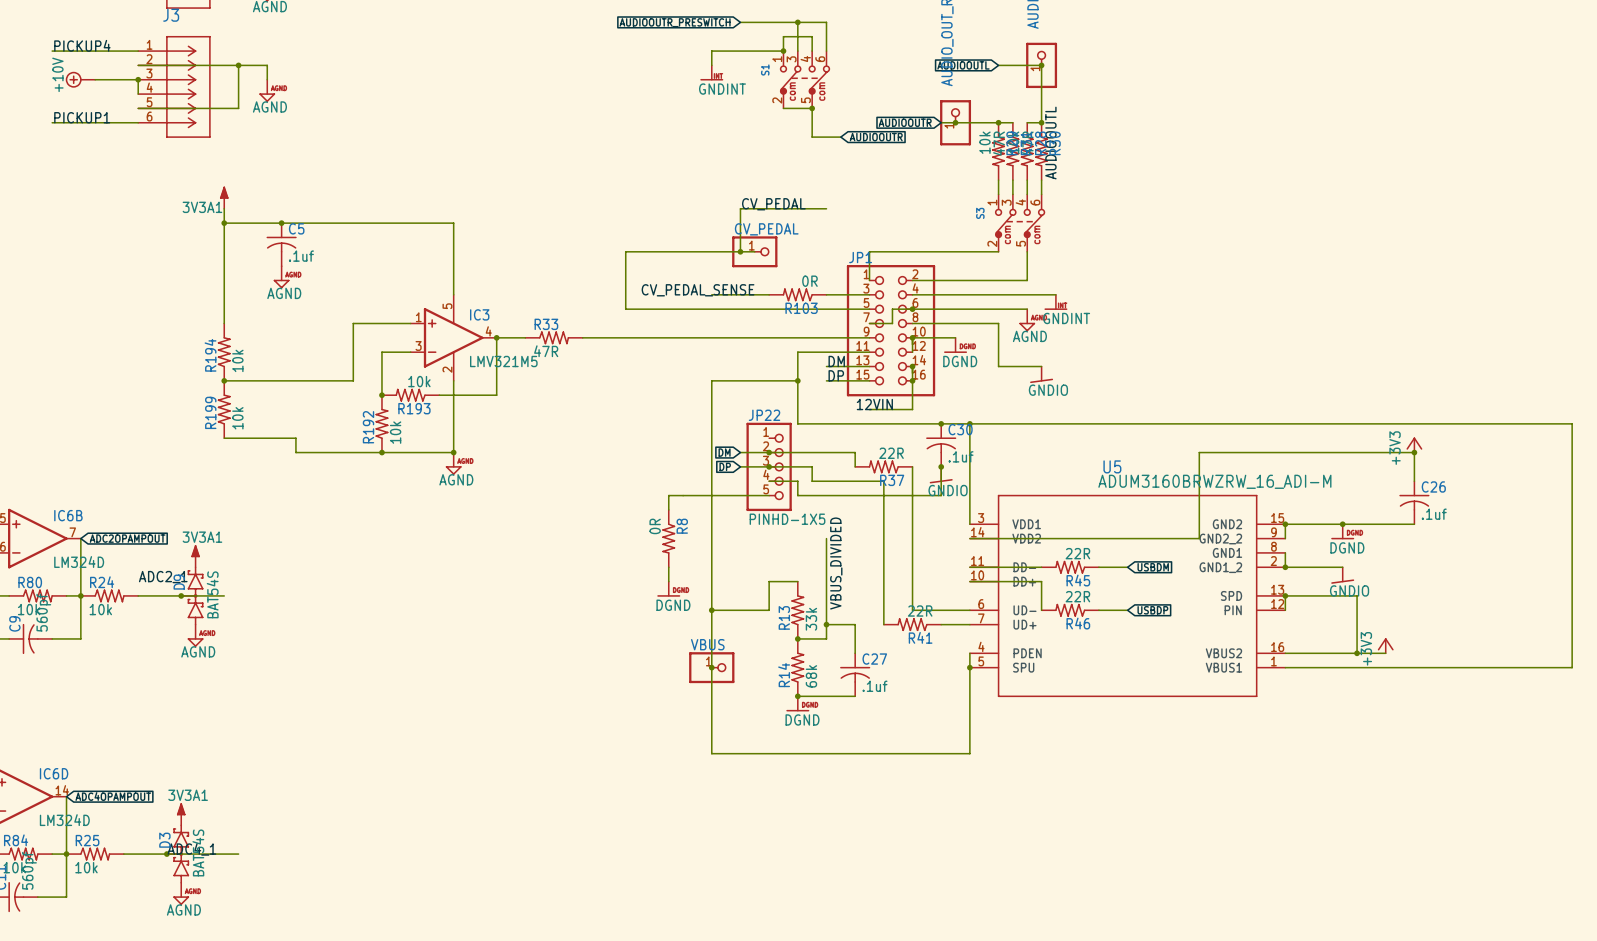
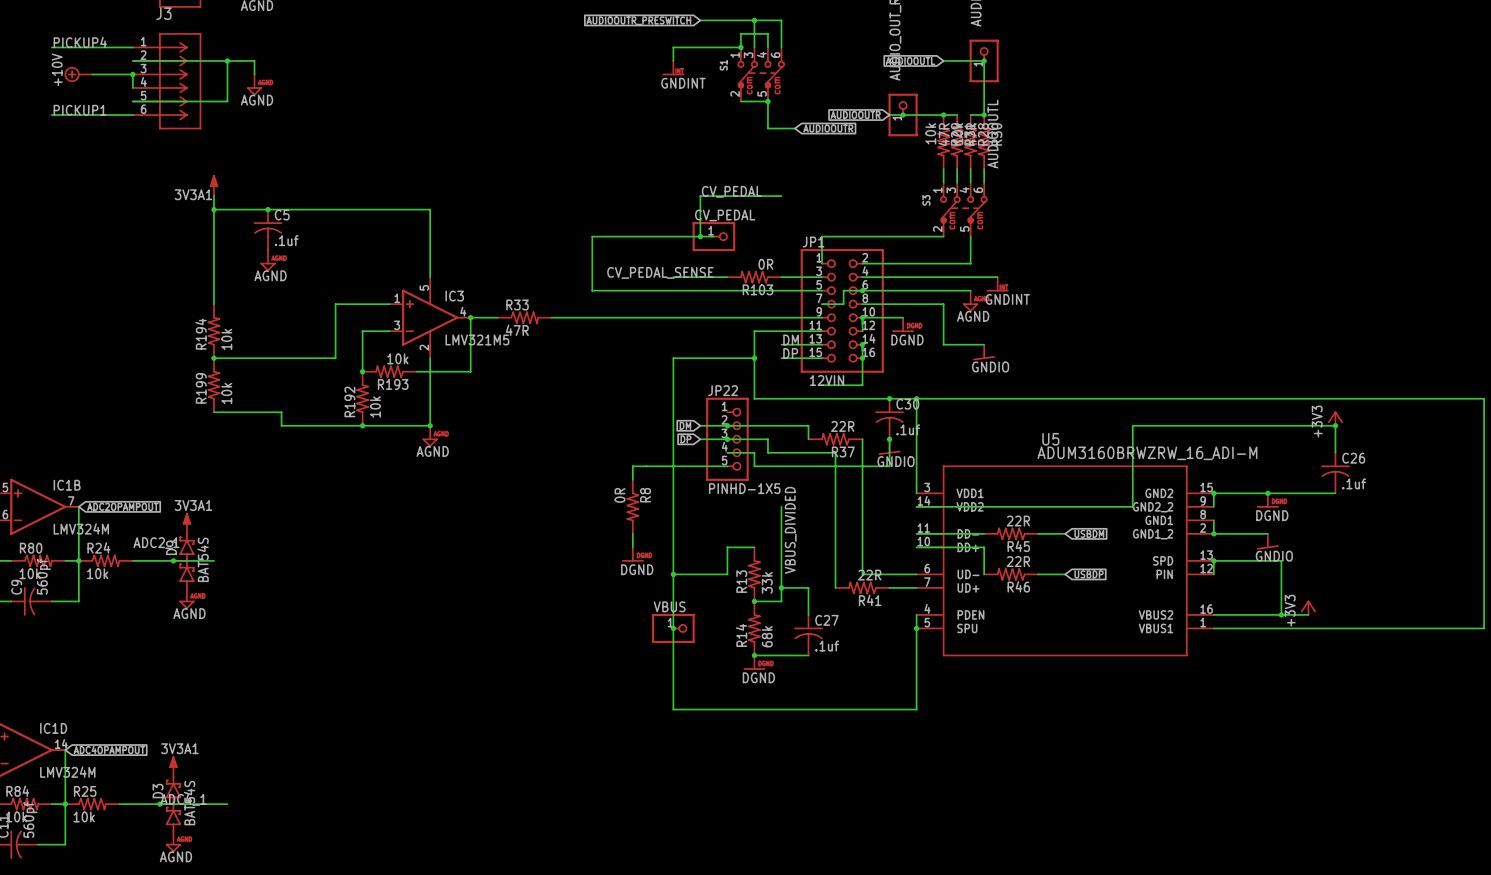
IC6B name: IC6B (68, 515) -> IC1B (67, 485)
IC6B value: LM324D (79, 562) -> LMV324M (81, 528)
IC6D name: IC6D (54, 773) -> IC1D (53, 728)
IC6D value: LM324D (64, 820) -> LMV324M (67, 772)

